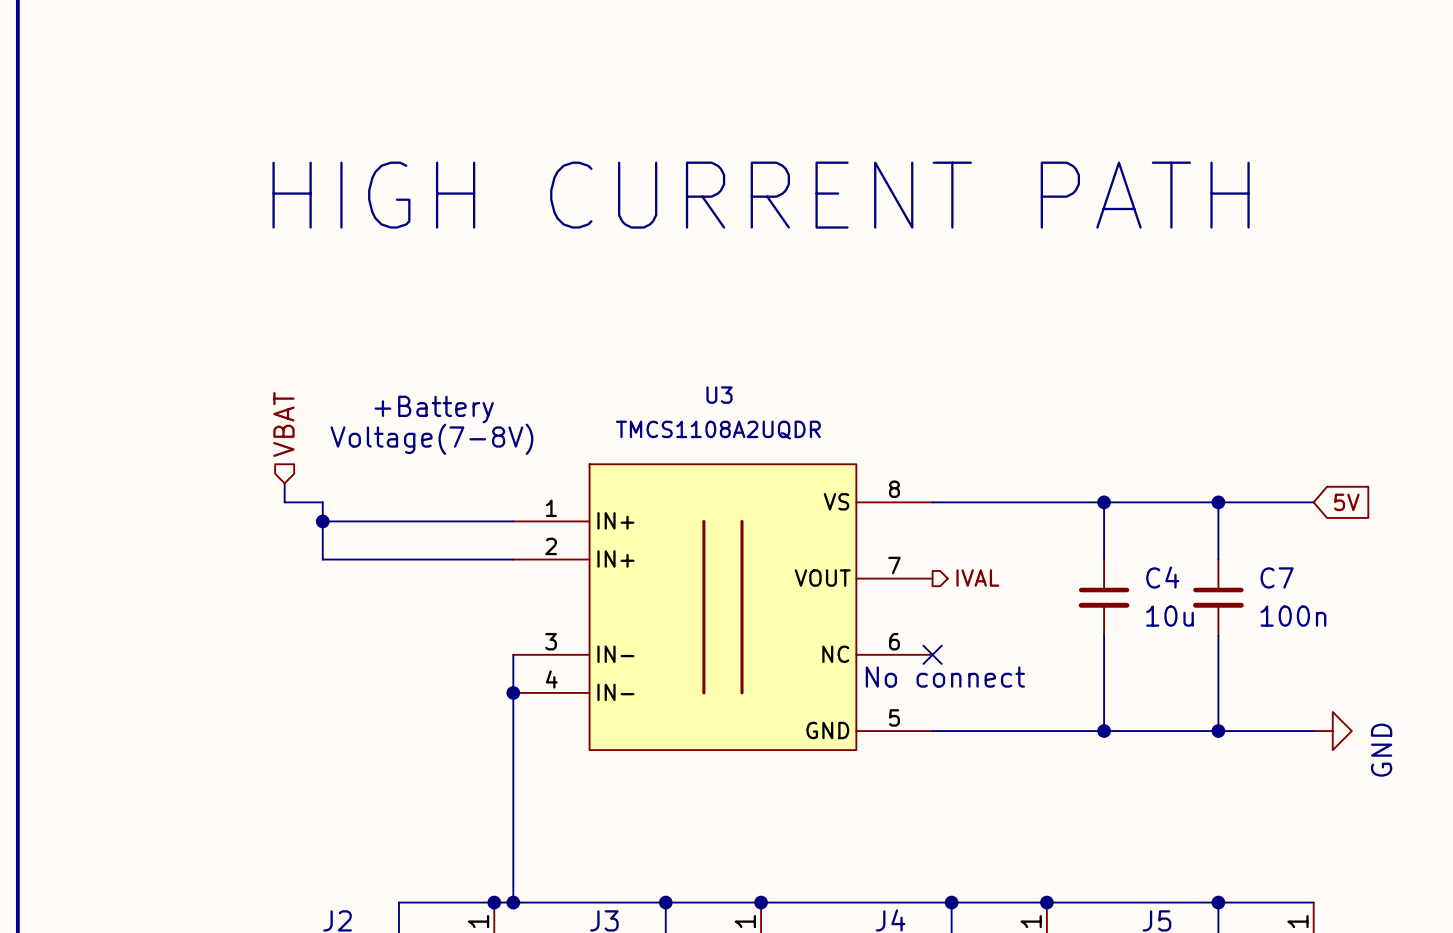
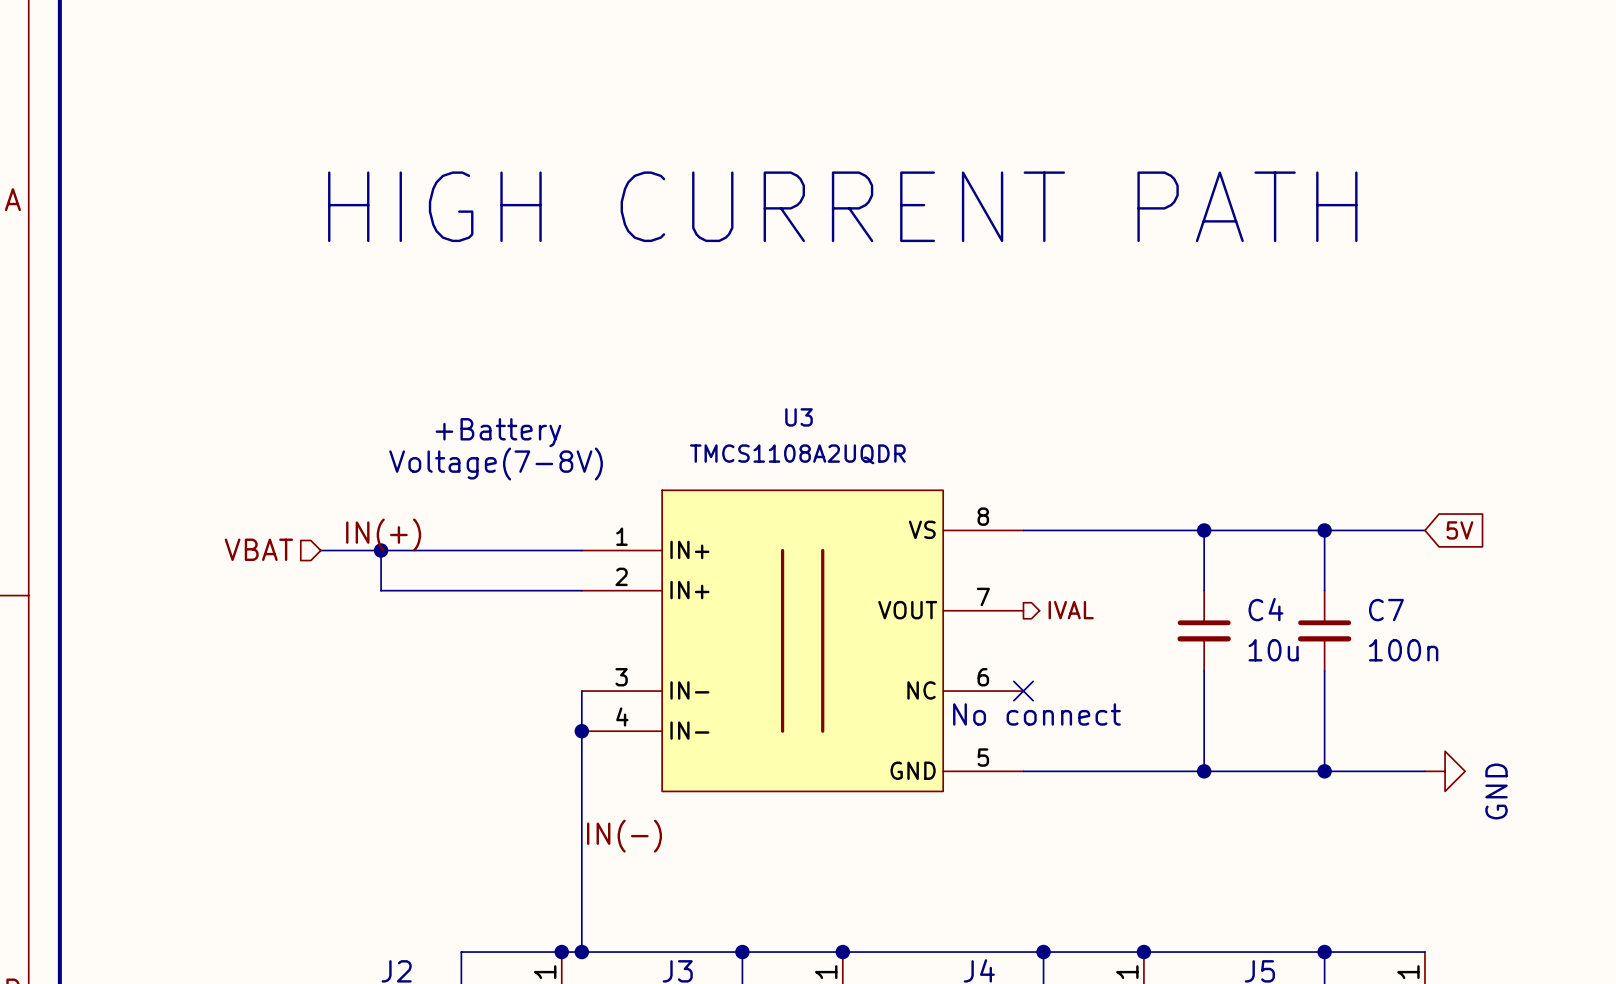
hierarchical label rotation: 0° (283, 424) -> 90° counterclockwise (258, 549)
hierarchical label position: VBAT (283, 424) -> VBAT (258, 549)
wire: (284, 483) (284, 502) (322, 502) (322, 521) -> (320, 550) (381, 550)
label: none -> IN(+) (383, 534)
label: none -> IN(-) (624, 836)

